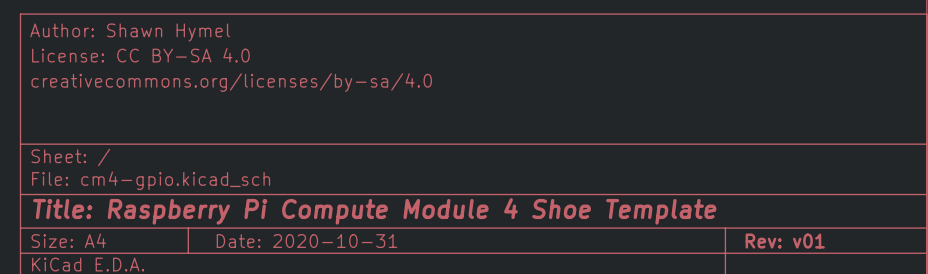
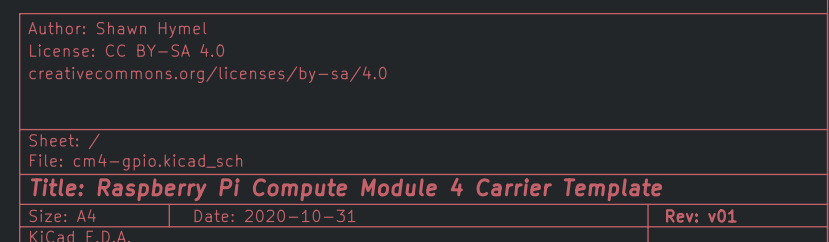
title block: Title: Raspberry Pi Compute Module 4 Shoe Template (374, 211) -> Title: Raspberry Pi Compute Module 4 Carrier Template (346, 189)

